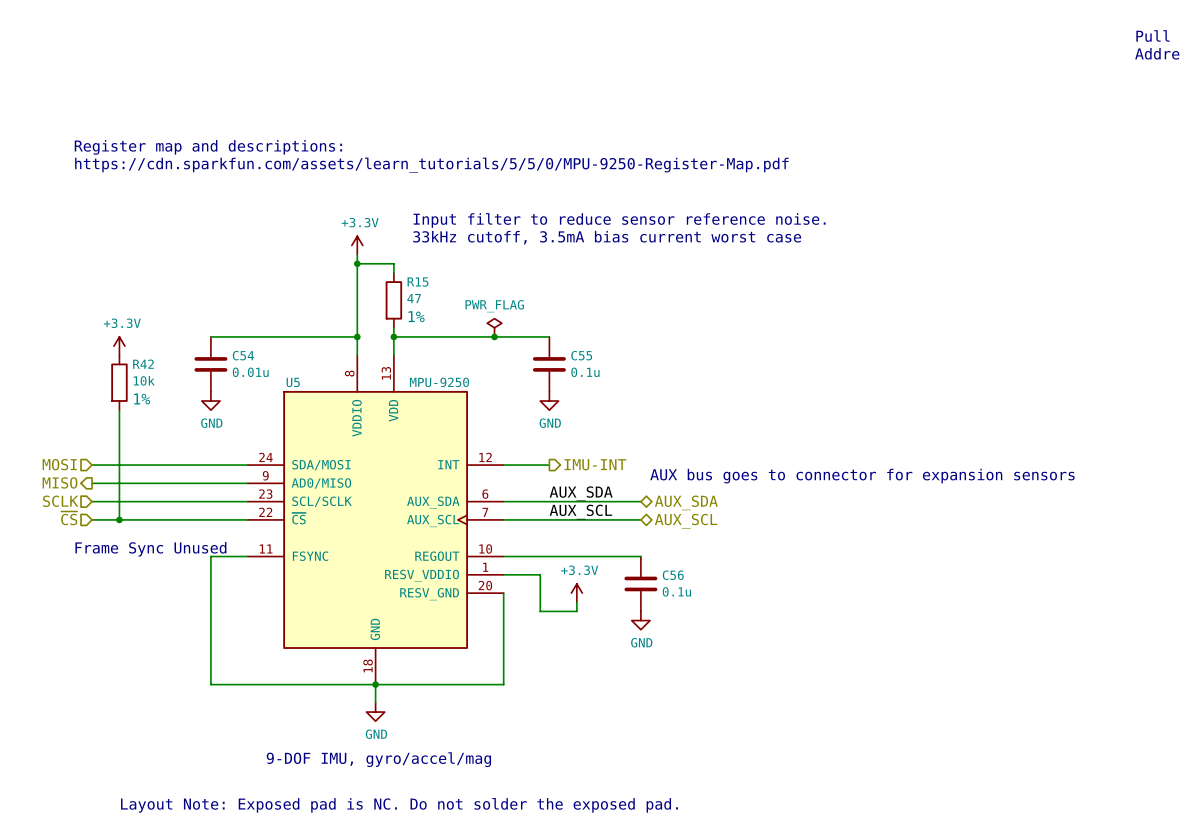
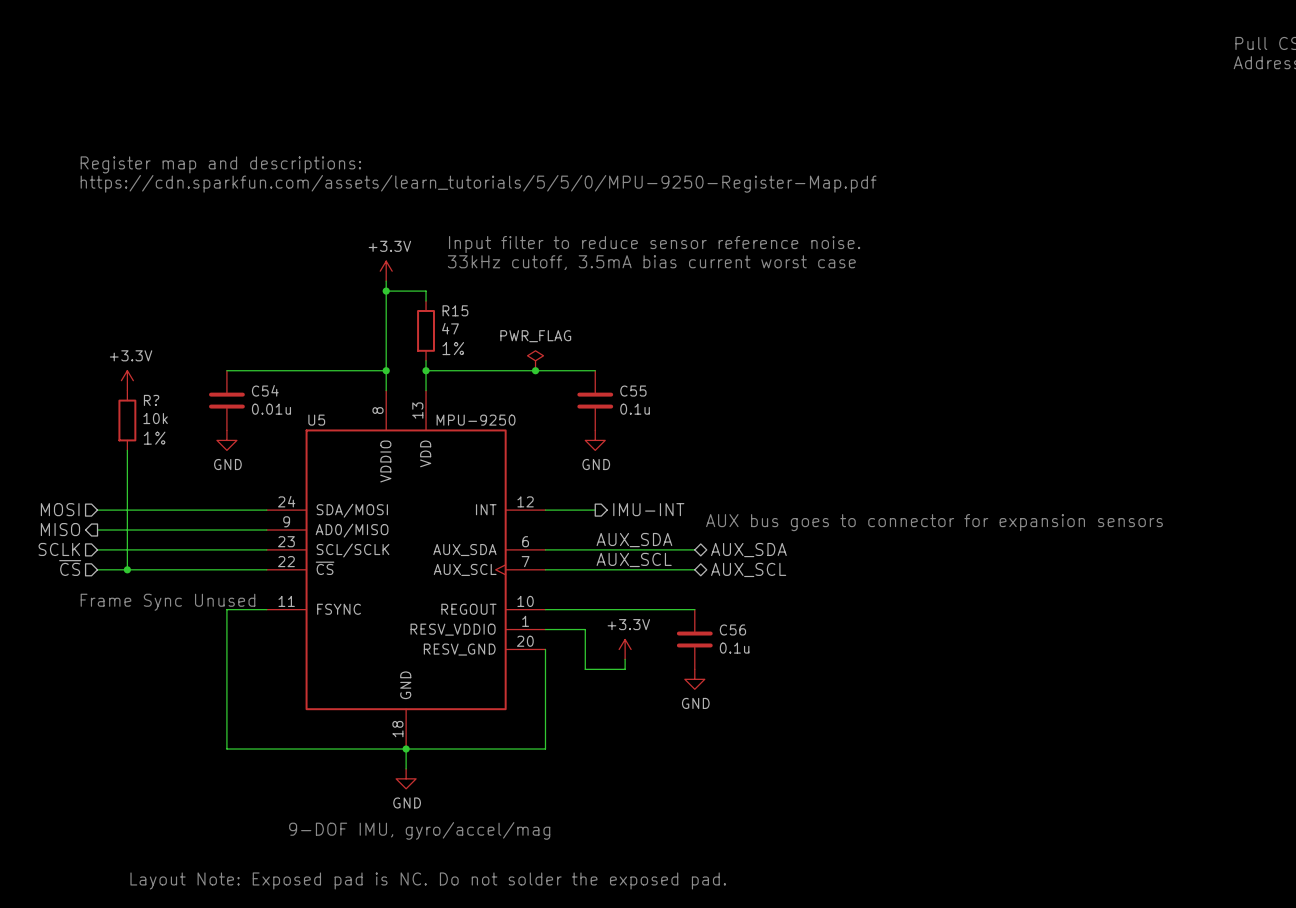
R42 name: R42 (143, 364) -> R? (151, 400)

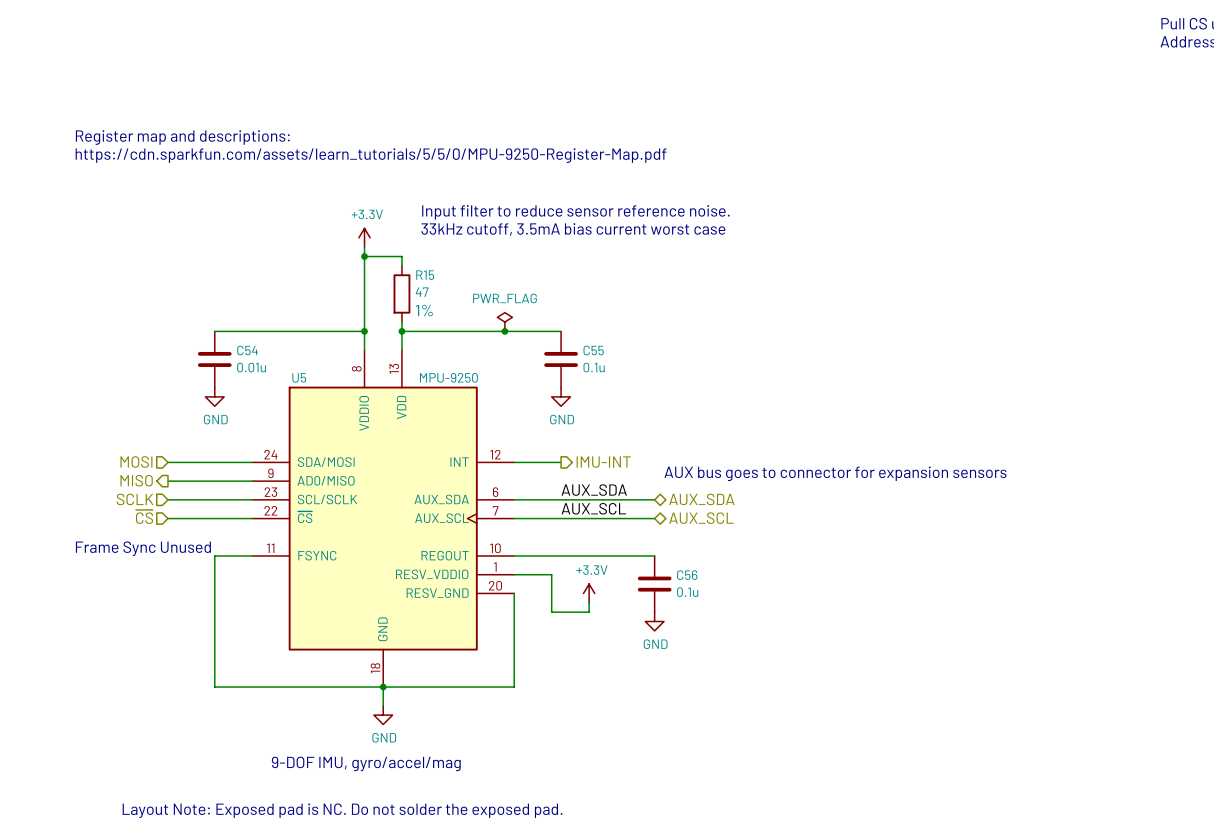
power symbol: +3.3V (127, 380) -> none
R?: 10k (127, 420) -> none
wire: (127, 450) (127, 569) -> none
hierarchical label position: MOSI (60, 509) -> MOSI (136, 462)
wire: (97, 510) (177, 510) -> none
hierarchical label position: MISO (60, 529) -> MISO (136, 480)
wire: (97, 530) (177, 530) -> none
hierarchical label position: SCLK (59, 549) -> SCLK (135, 499)
wire: (97, 549) (177, 549) -> none
hierarchical label position: ~{CS} (70, 568) -> ~{CS} (144, 516)
wire: (97, 569) (177, 569) -> none
junction: (127, 569) -> none

